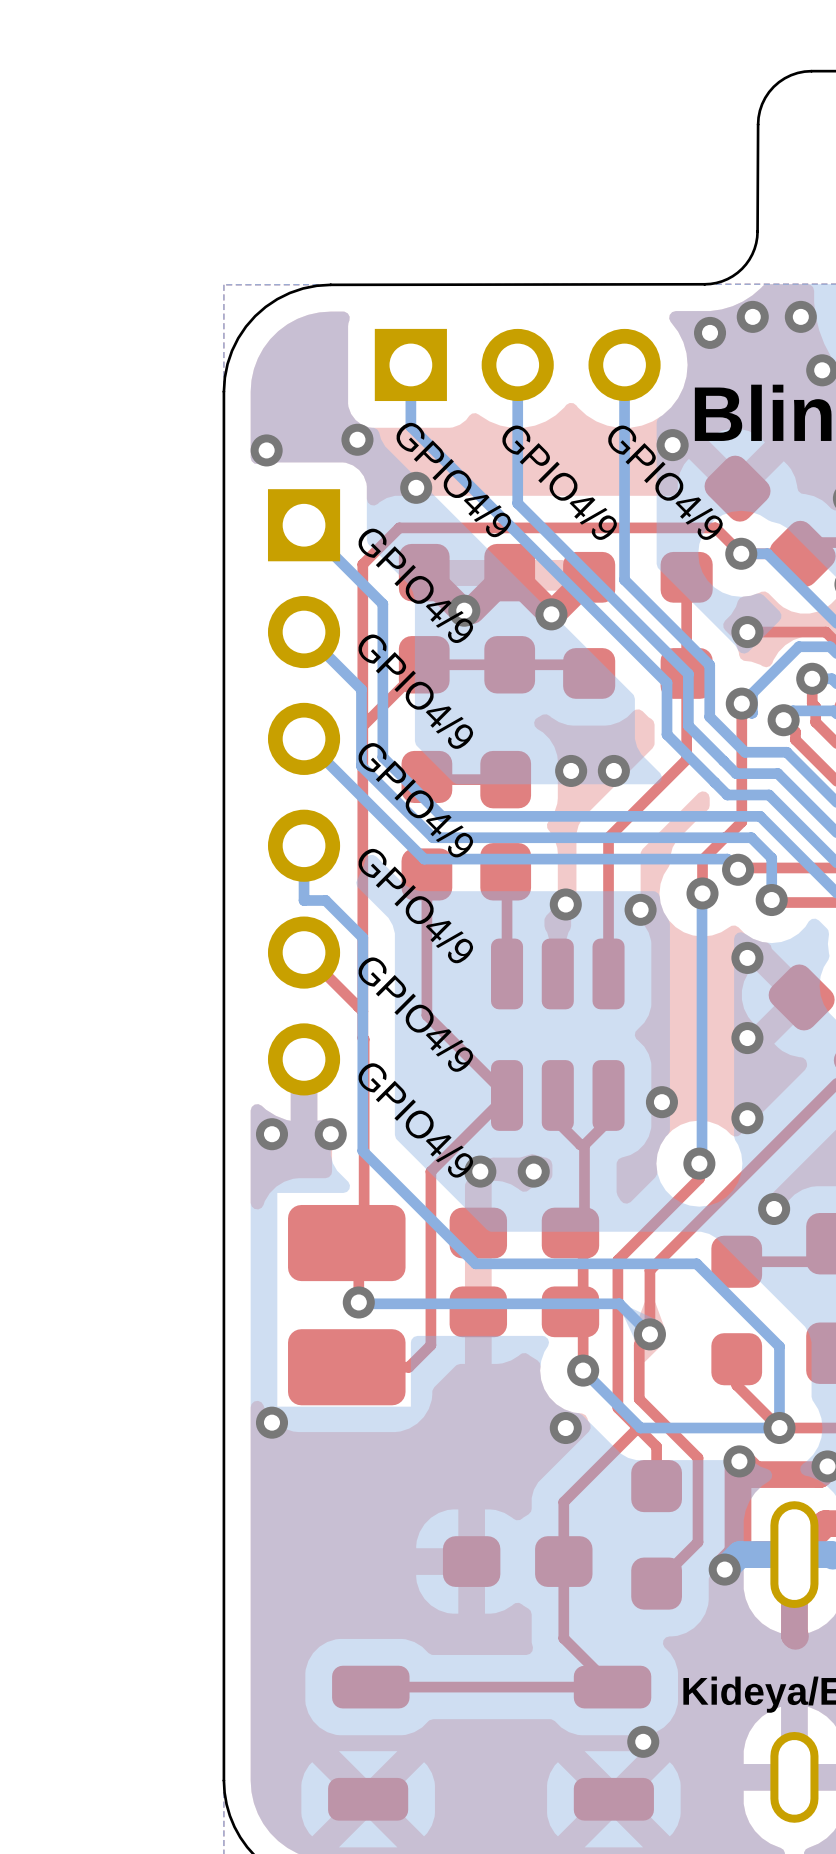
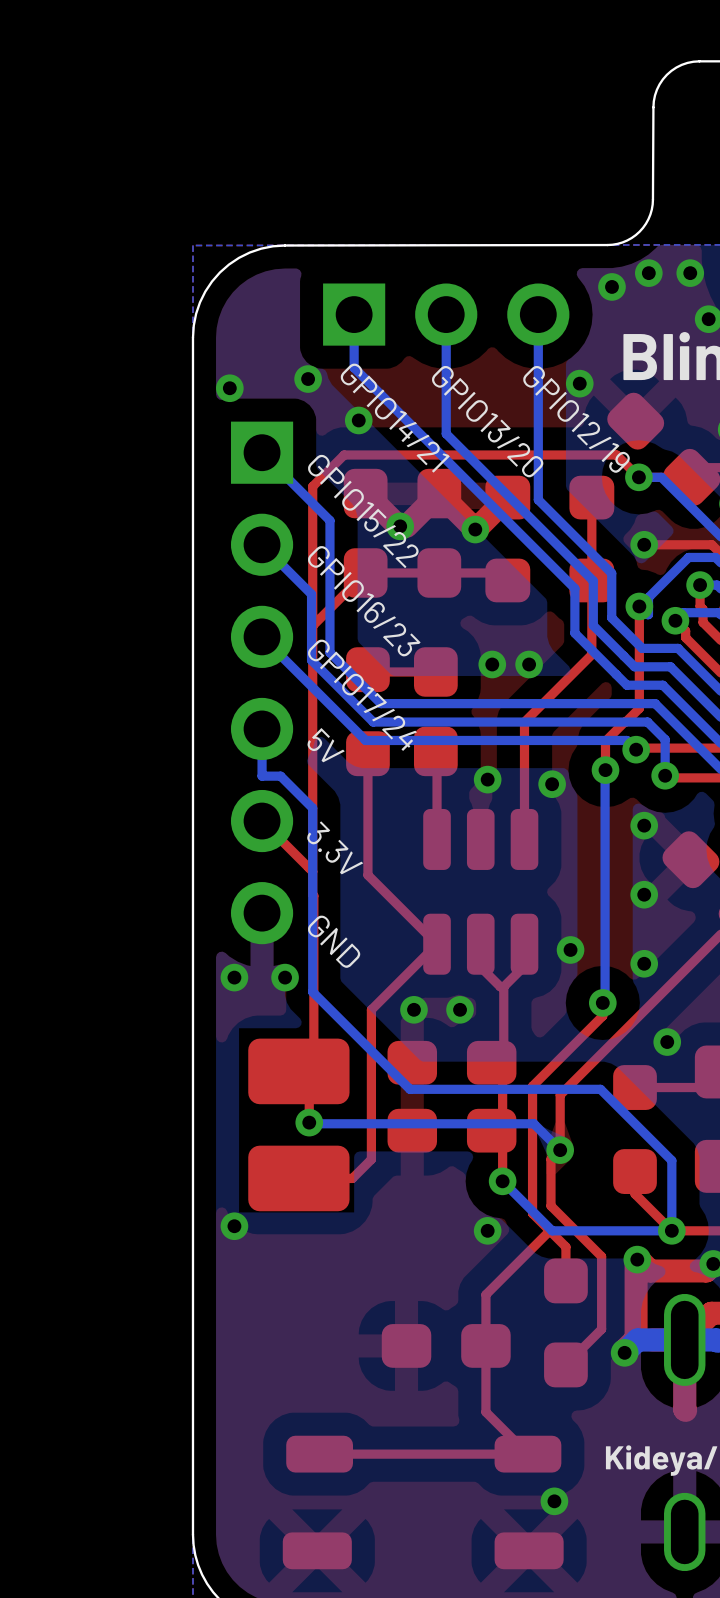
text: GPIO4/9 (453, 480) -> GPIO14/21 (395, 418)
text: GPIO4/9 (559, 483) -> GPIO13/20 (487, 421)
text: GPIO4/9 (665, 483) -> GPIO12/19 (576, 419)
text: GPIO4/9 (415, 586) -> GPIO15/22 (363, 511)
text: GPIO4/9 (415, 692) -> GPIO16/23 (364, 601)
text: GPIO4/9 (415, 800) -> GPIO17/24 (362, 695)
text: GPIO4/9 (415, 906) -> 5V (326, 745)
text: GPIO4/9 (415, 1014) -> 3.3V (335, 847)
text: GPIO4/9 (415, 1120) -> GND (334, 941)

